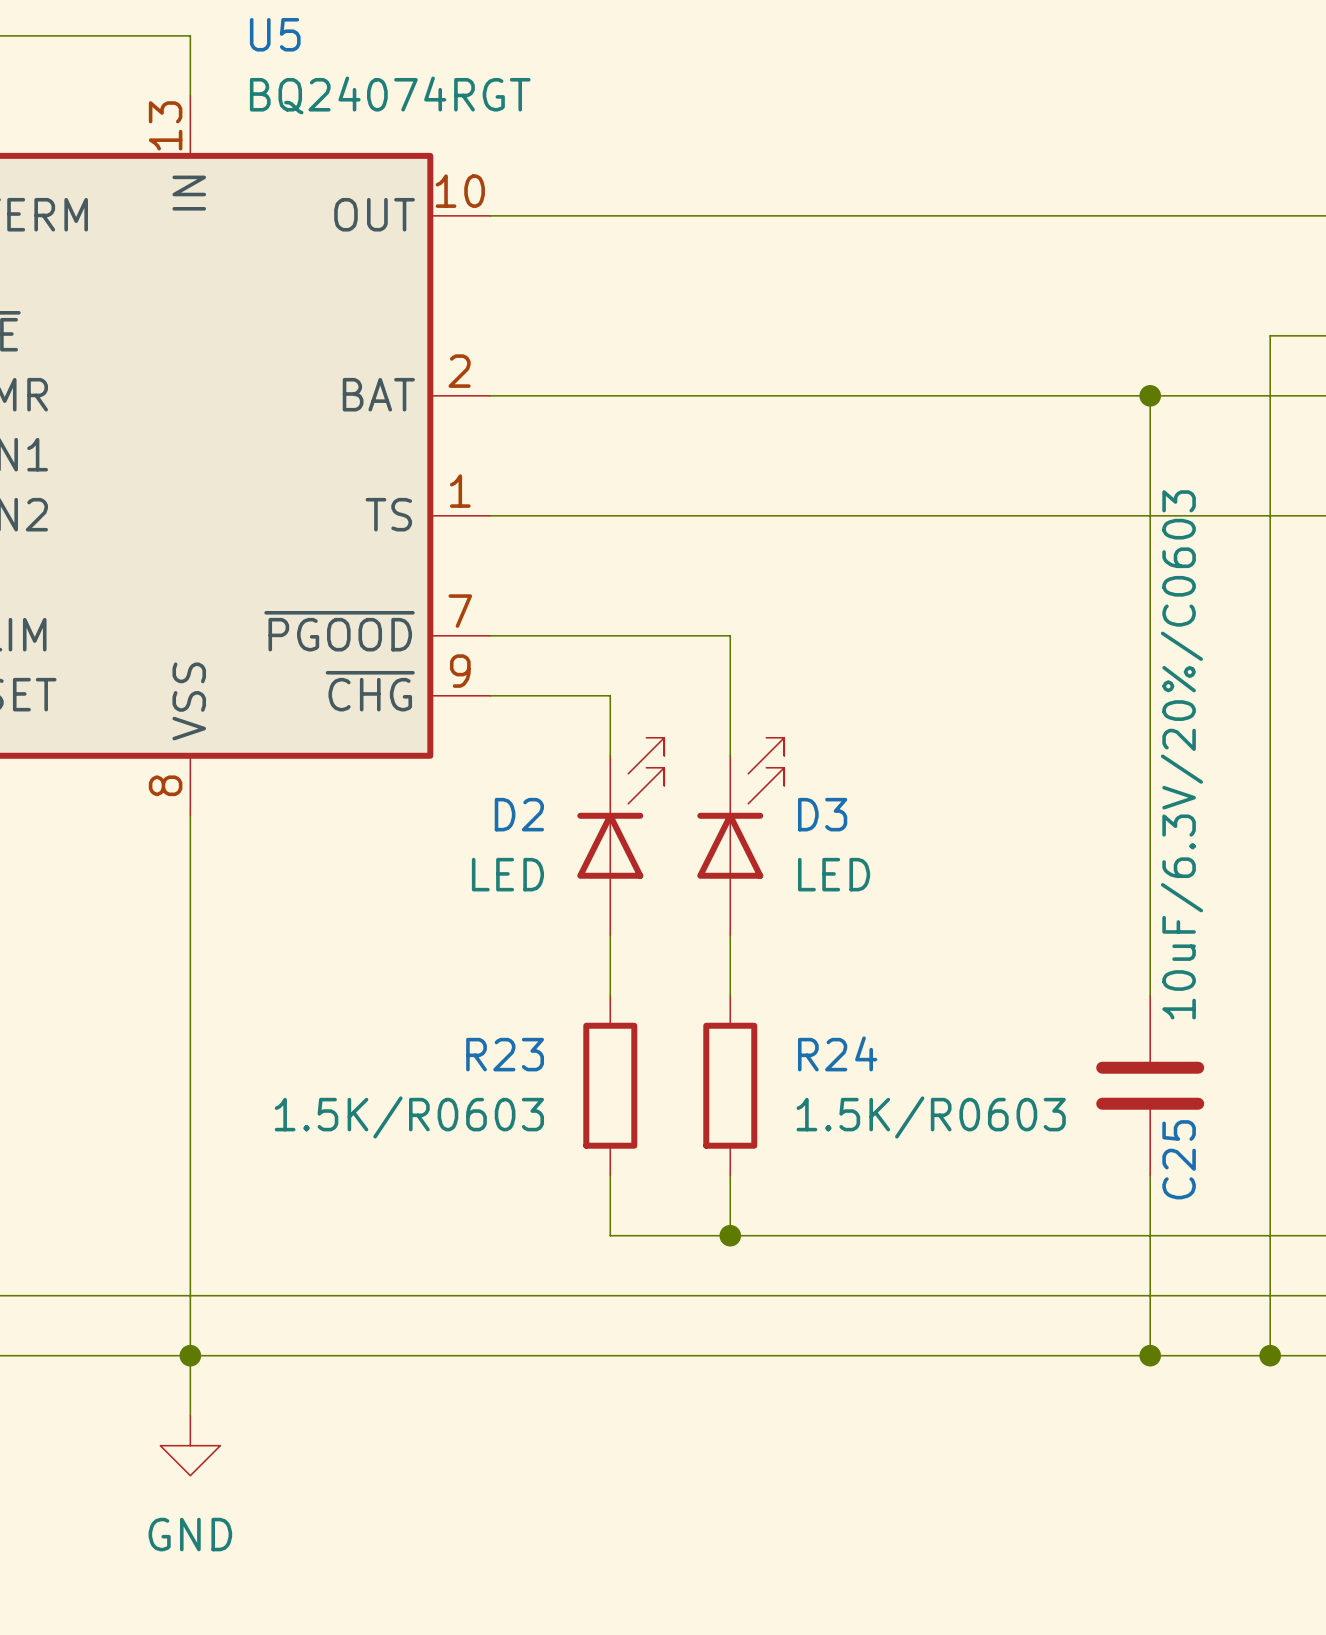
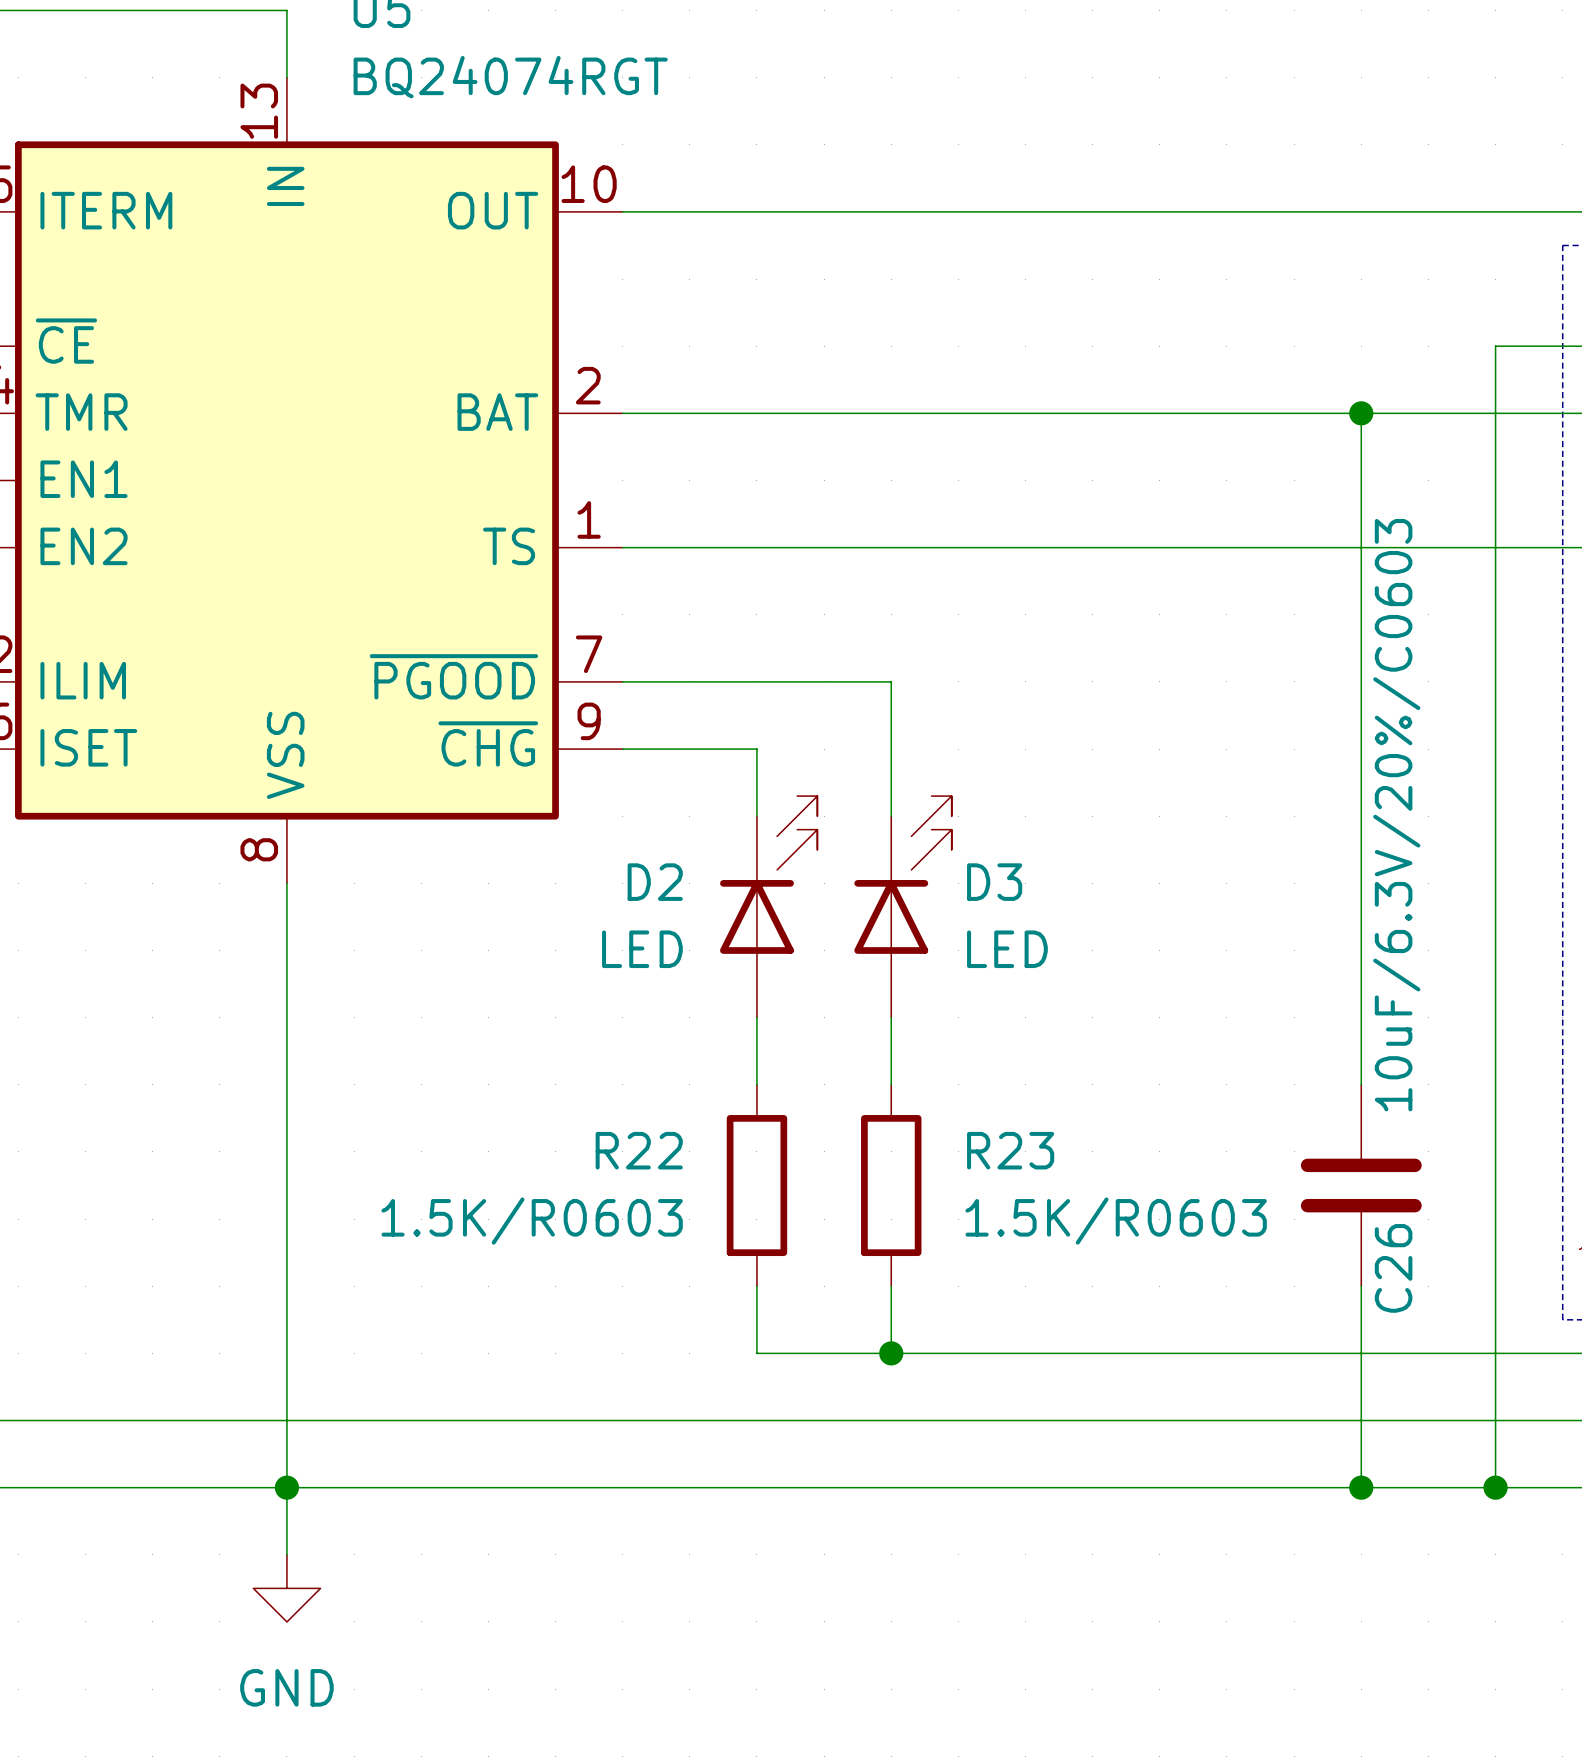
R24 name: R24 (837, 1053) -> R23 (1010, 1150)
R23 name: R23 (505, 1054) -> R22 (639, 1150)
C25 name: C25 (1179, 1159) -> C26 (1393, 1268)

